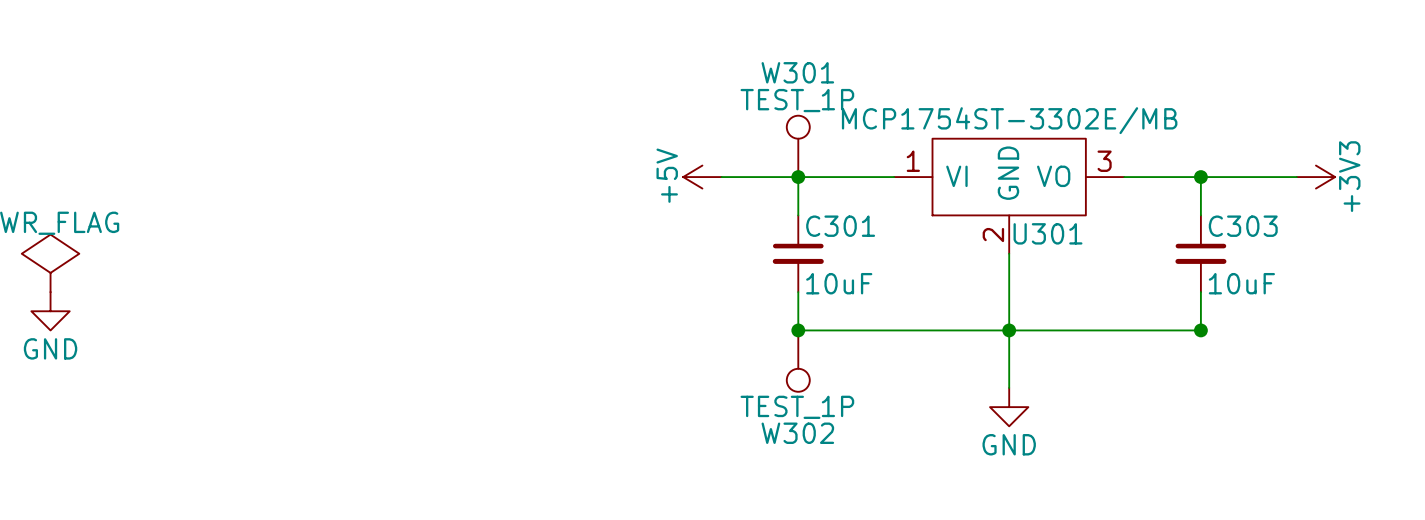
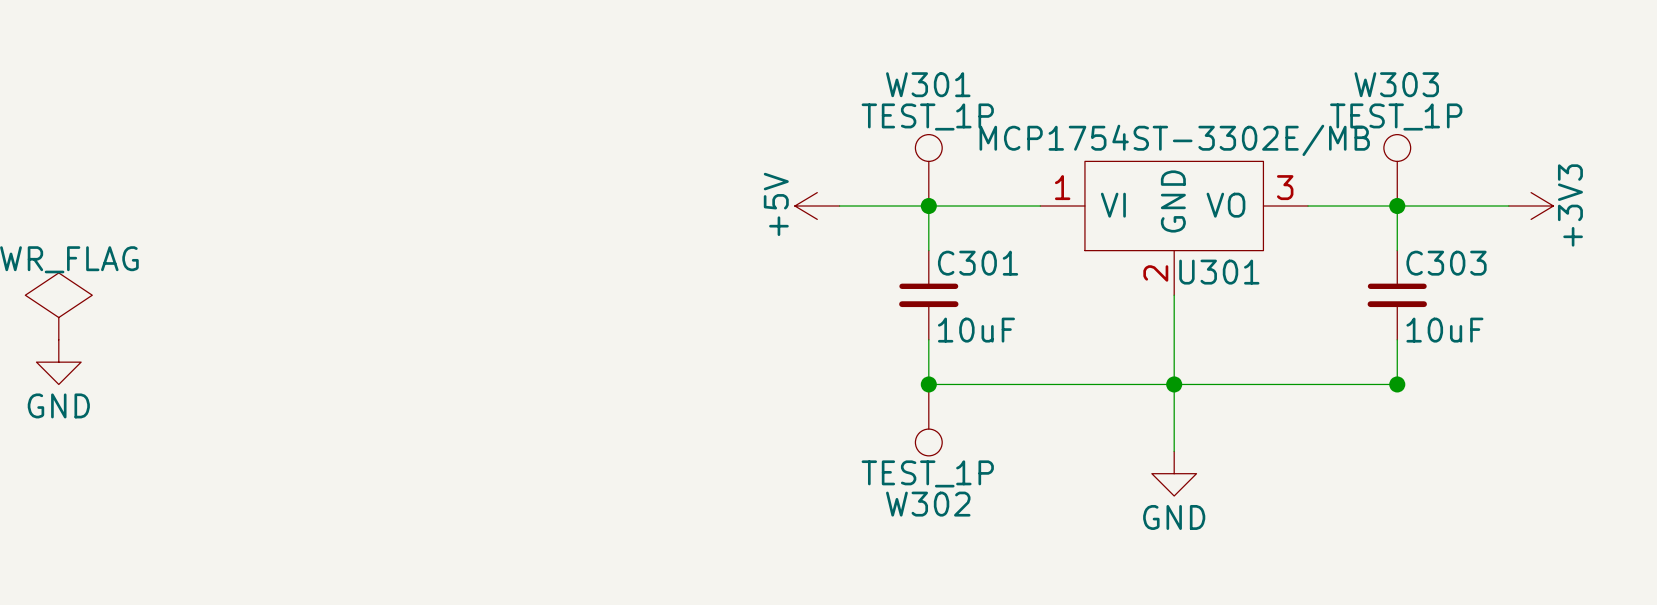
W303: none -> TEST_1P (1397, 170)

